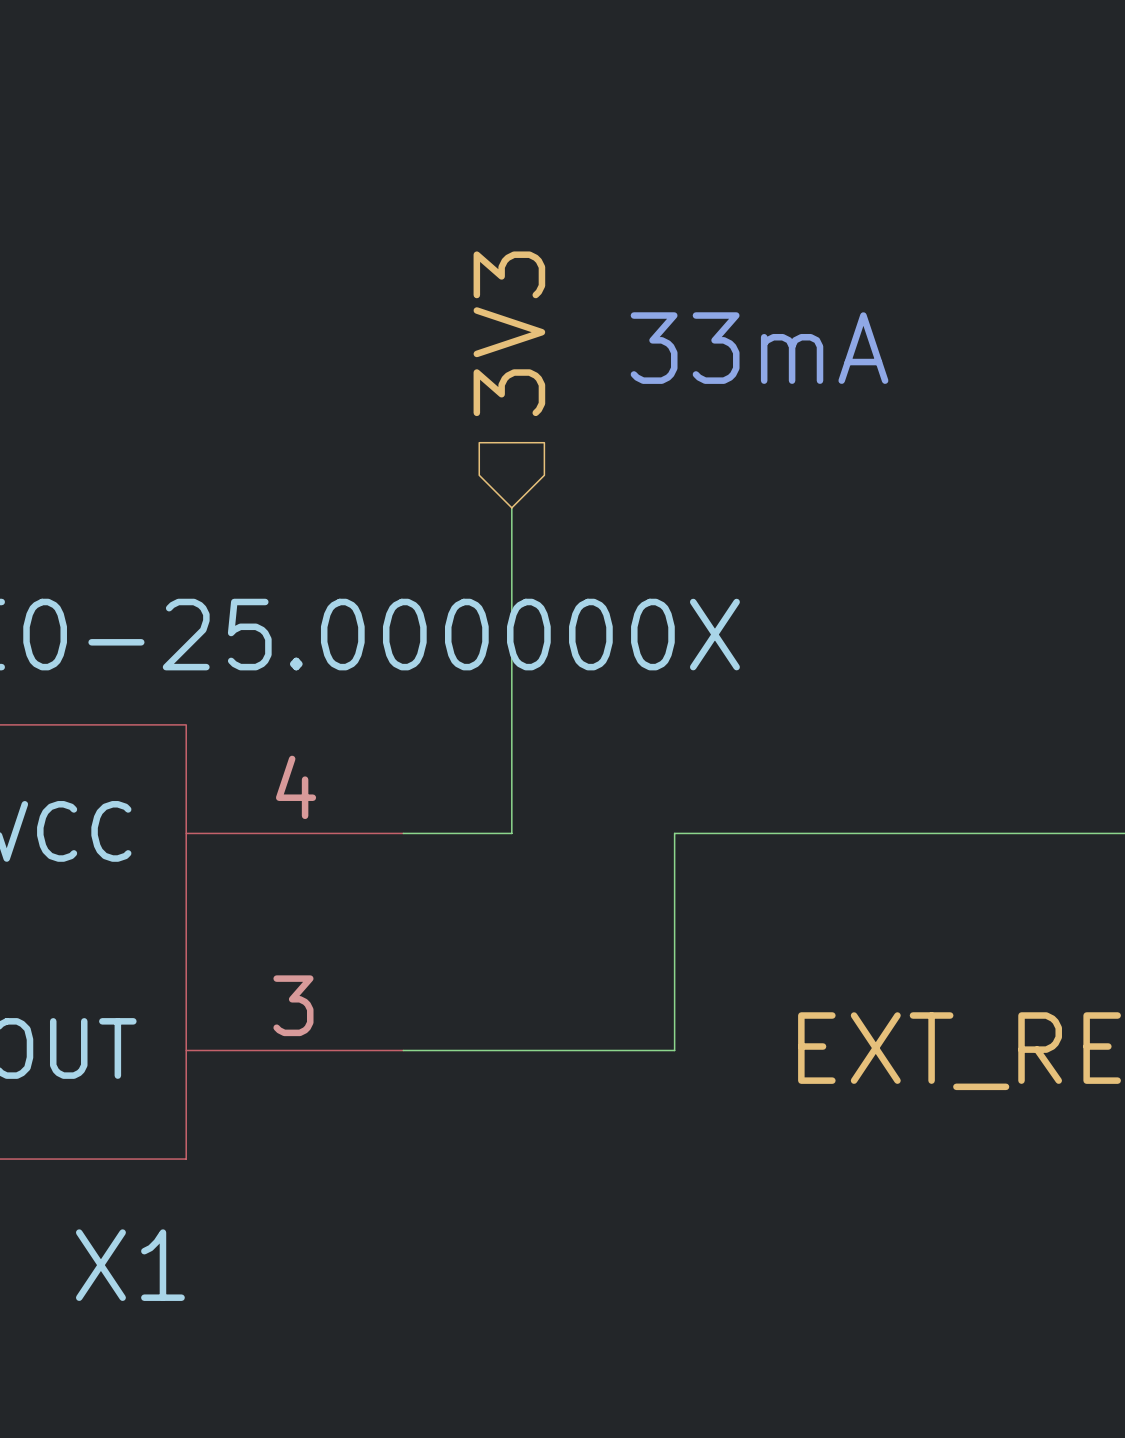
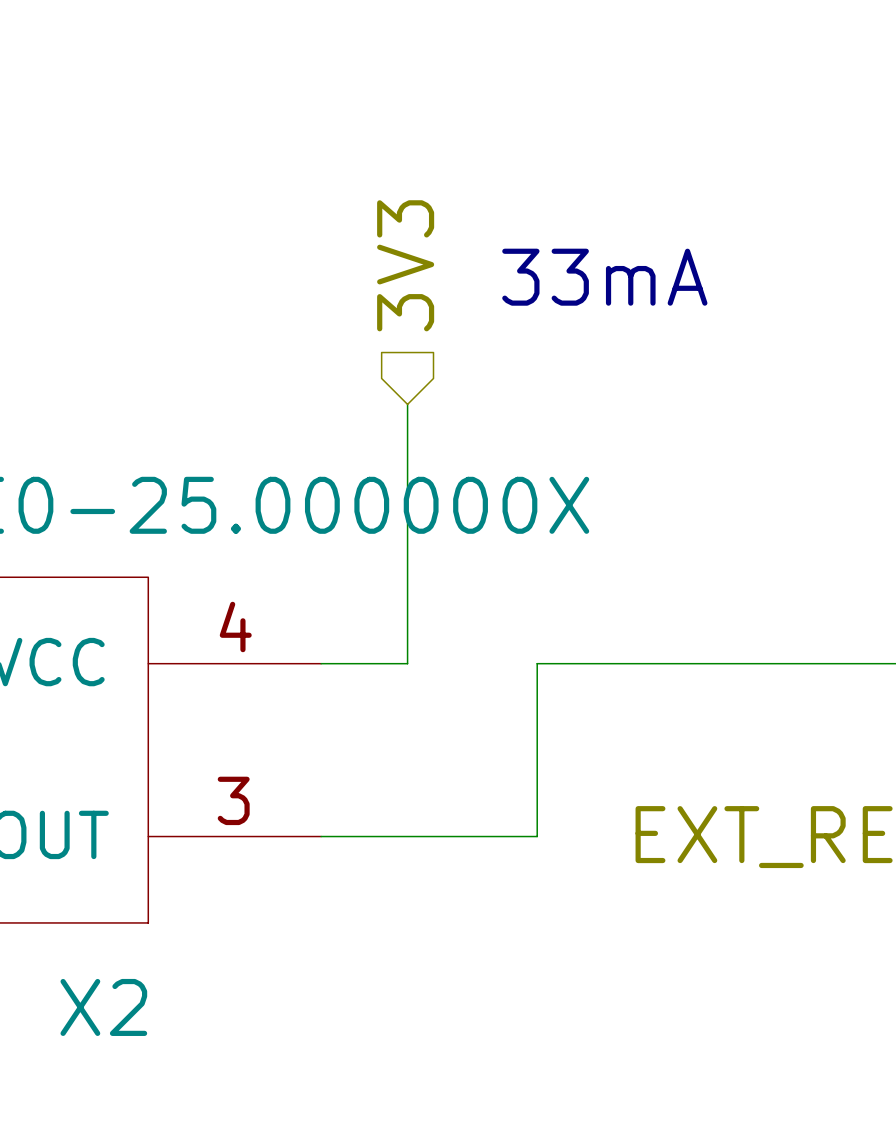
X1 name: X1 (130, 1265) -> X2 (103, 1007)

